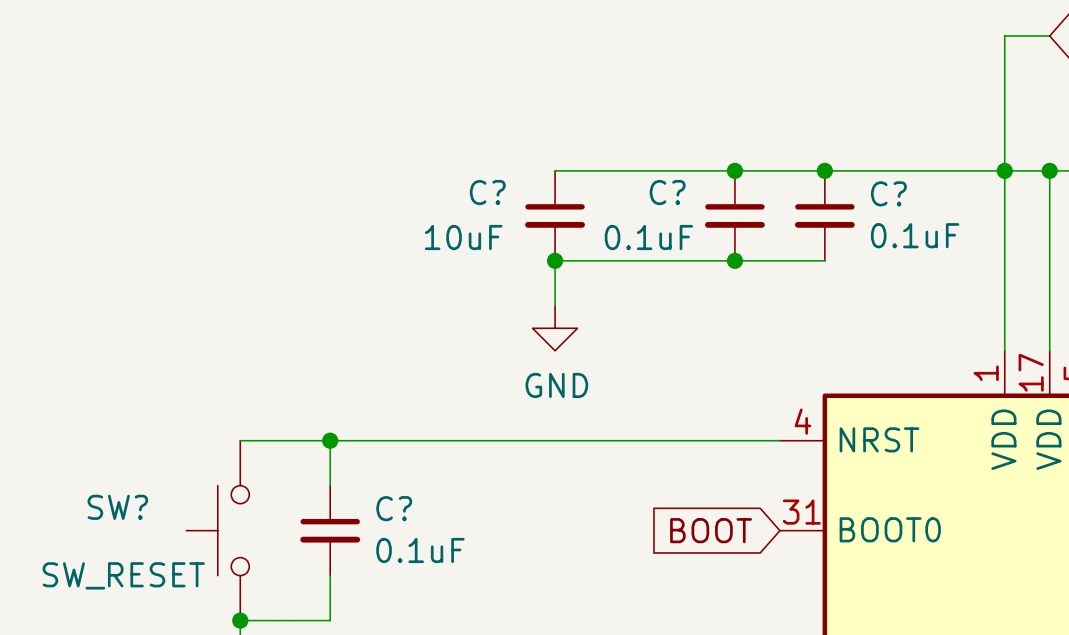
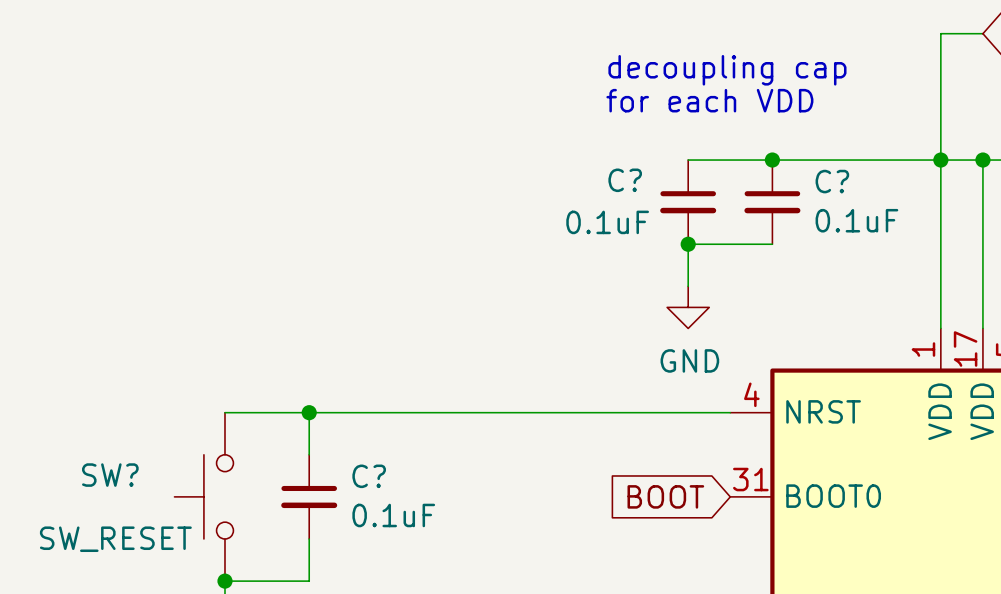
text: none -> decoupling cap (727, 70)
text: none -> for each VDD (709, 100)
wire: (555, 170) (734, 170) -> none
junction: (734, 170) -> none
C?: 10uF (555, 215) -> none
junction: (555, 260) -> none
wire: (734, 260) (555, 260) (555, 305) -> (688, 244) (688, 286)
power symbol position: GND (555, 328) -> GND (688, 307)

